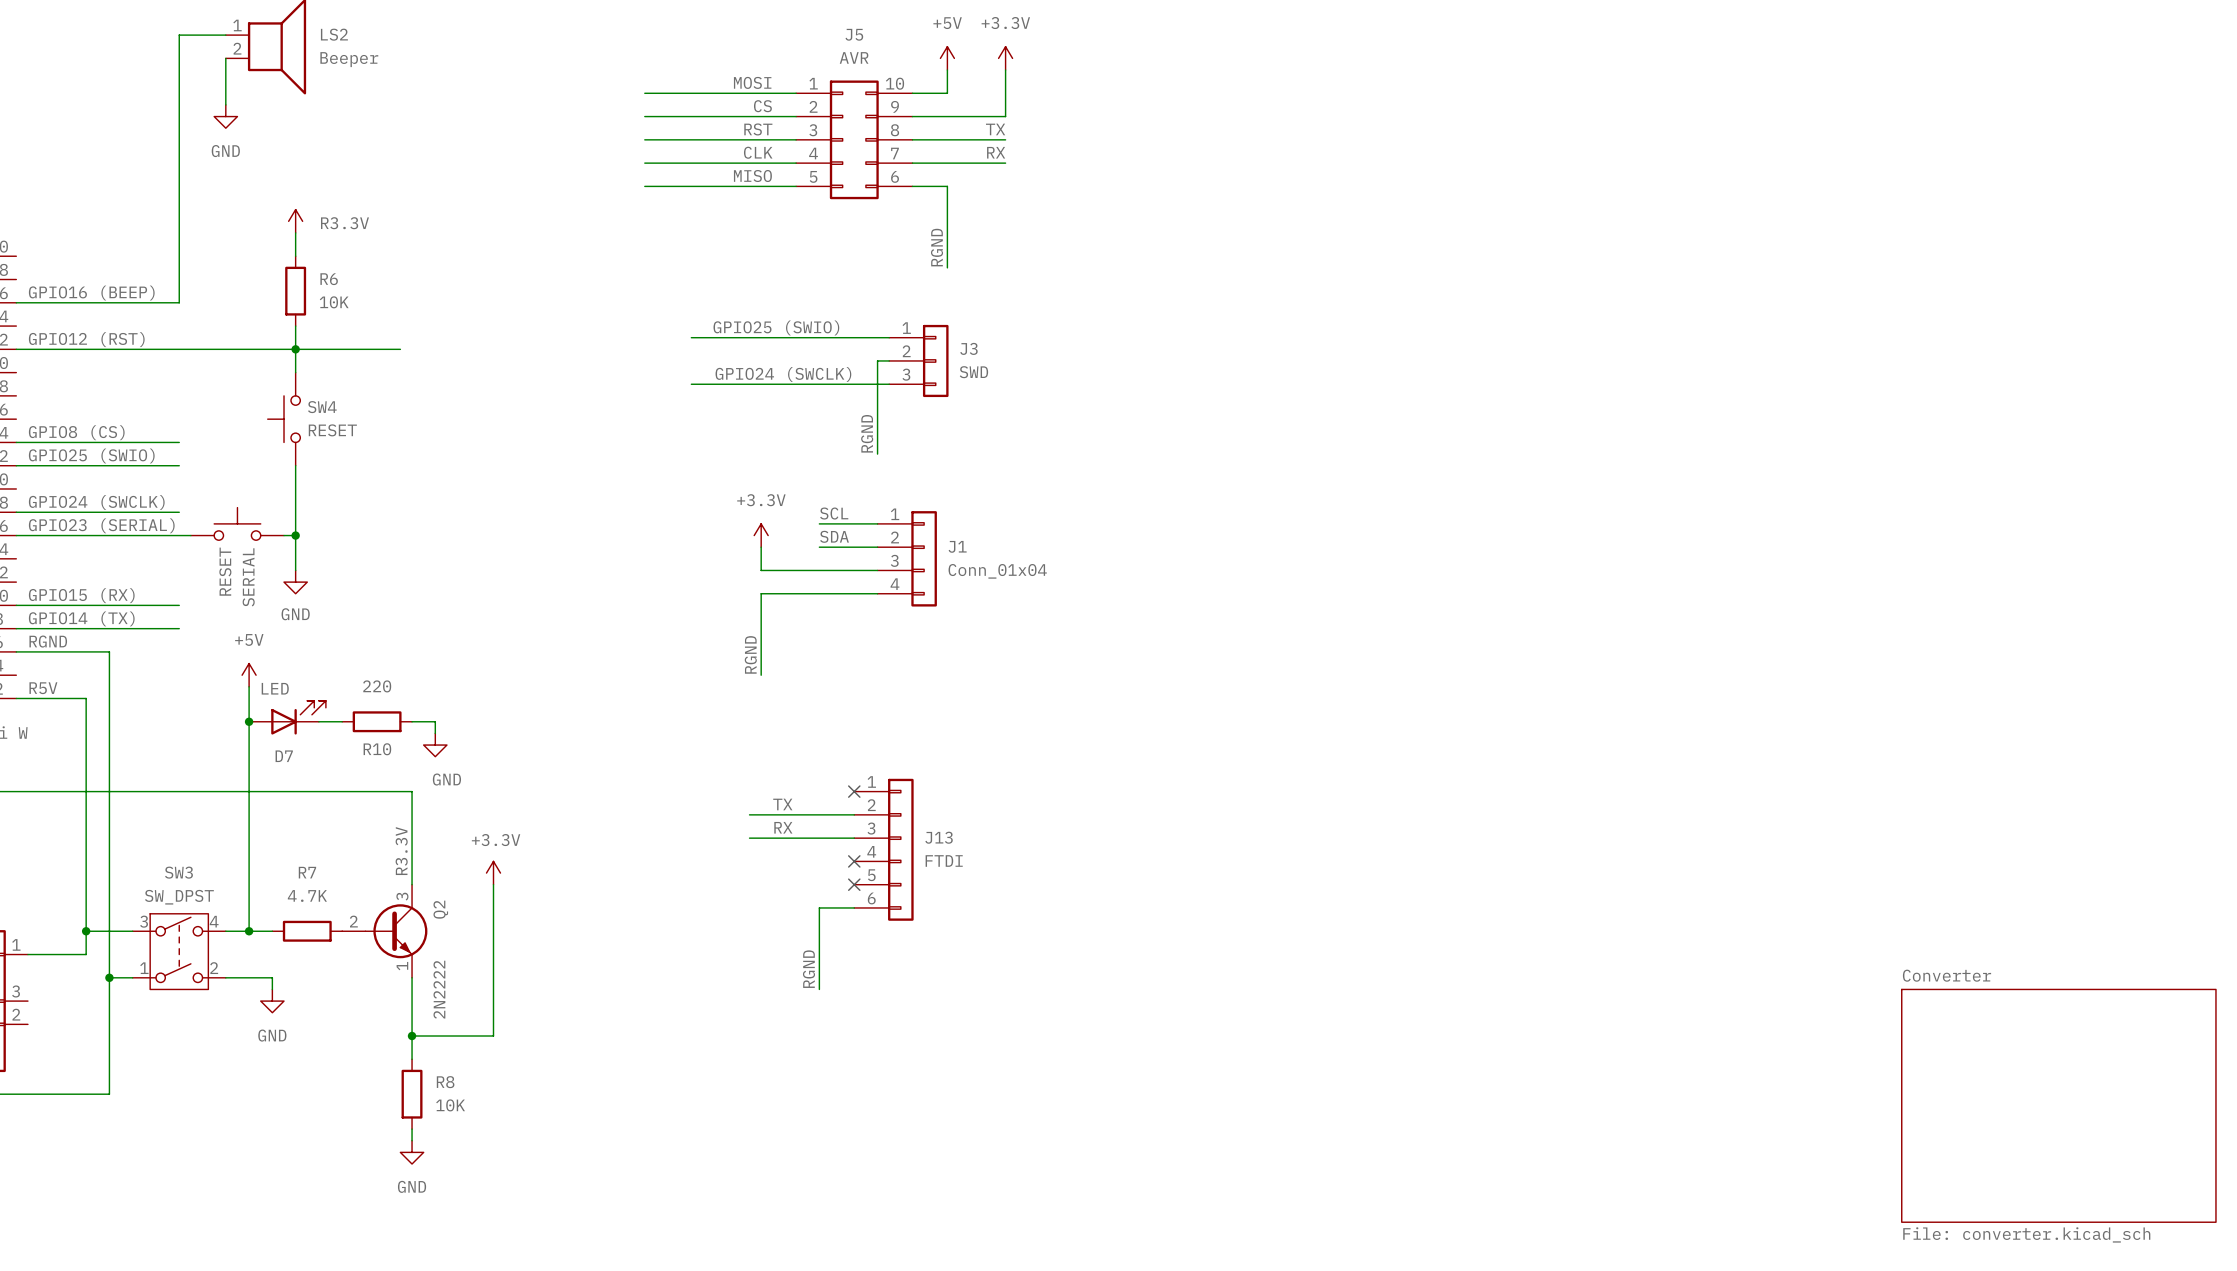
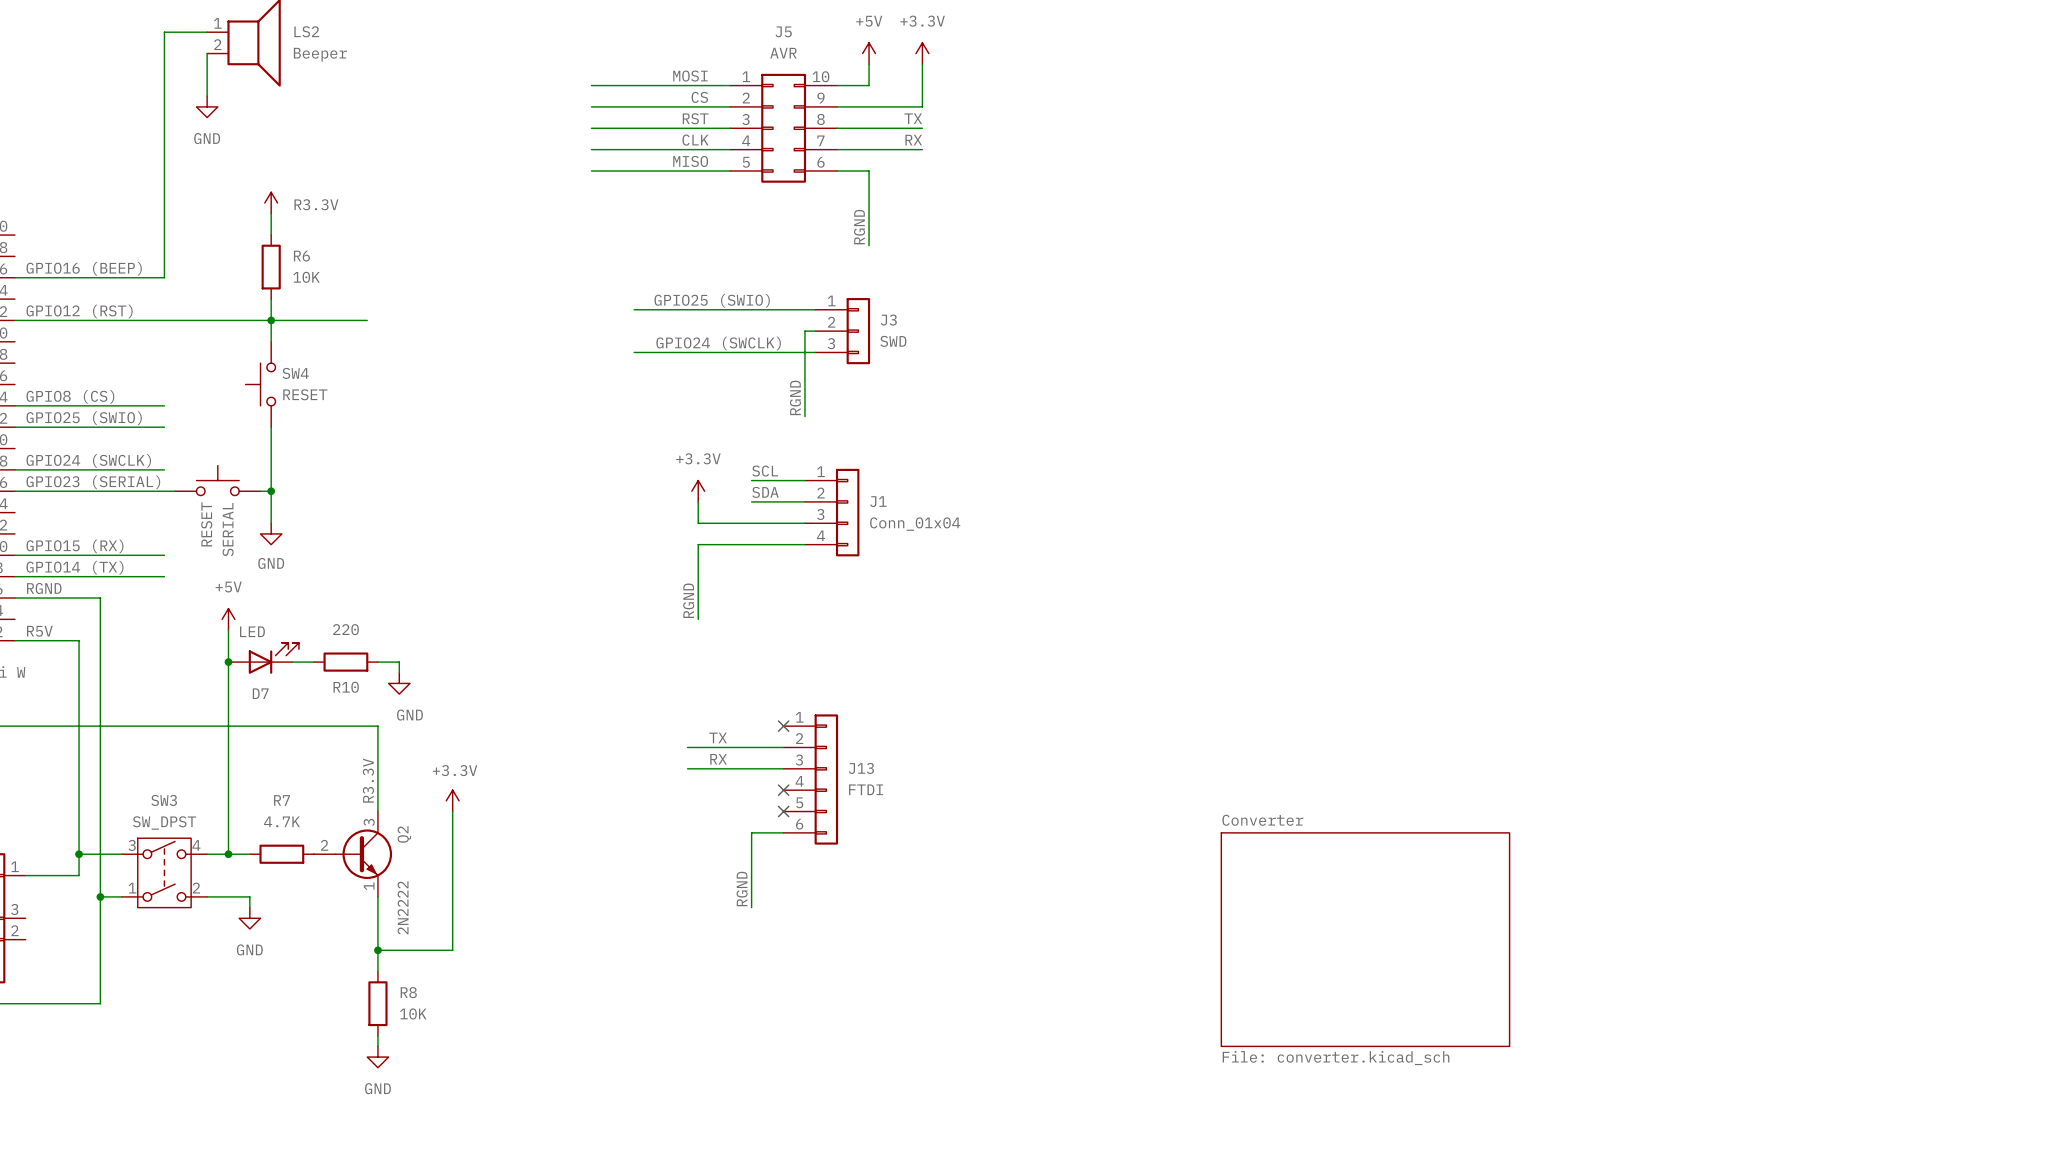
sheet Converter: none -> File: converter.kicad_sch (1365, 939)
sheet Converter: File: converter.kicad_sch (2058, 1105) -> none

